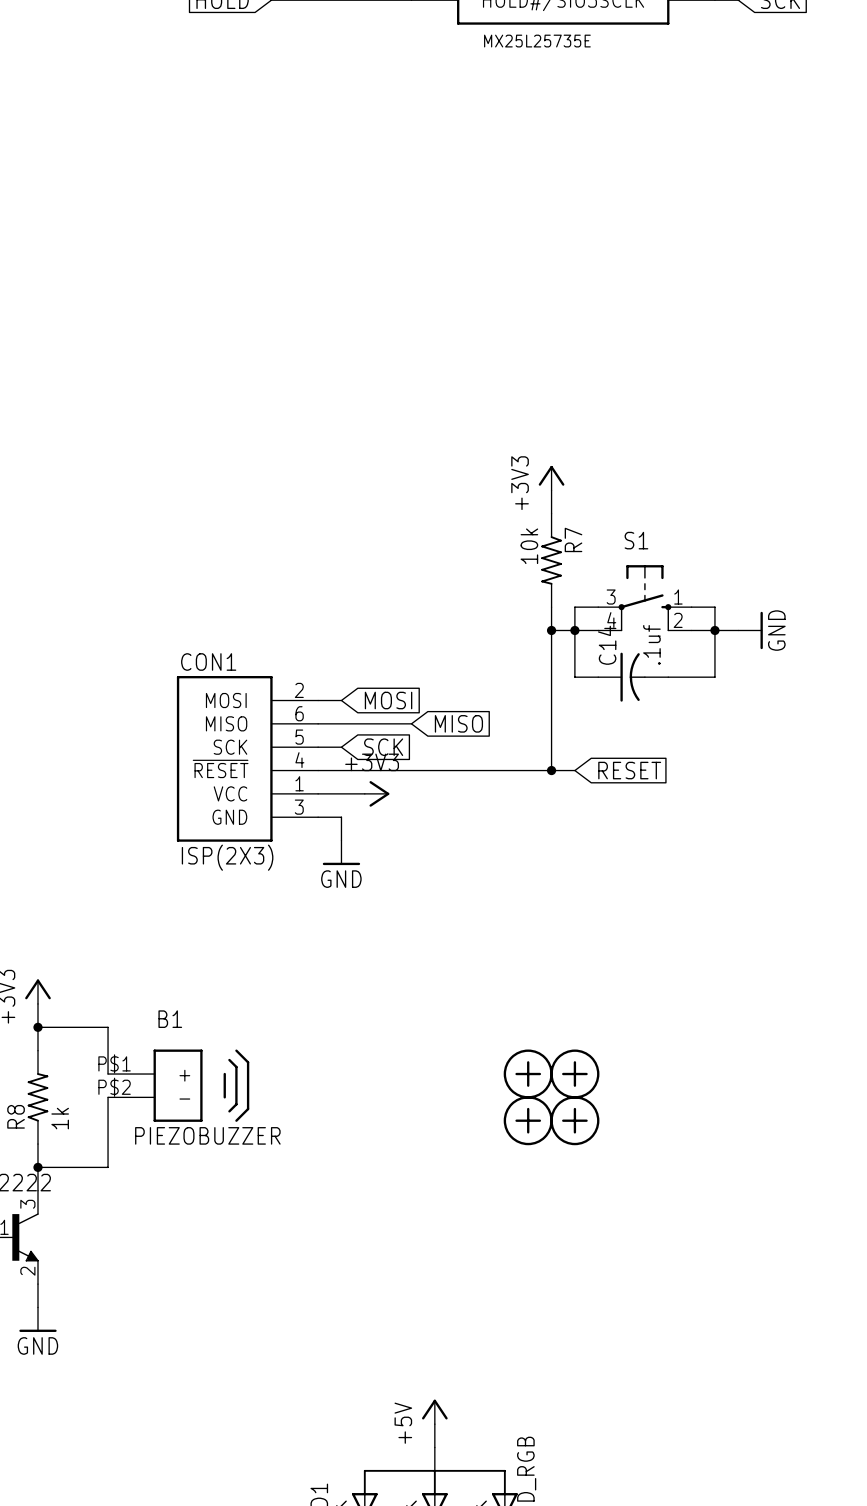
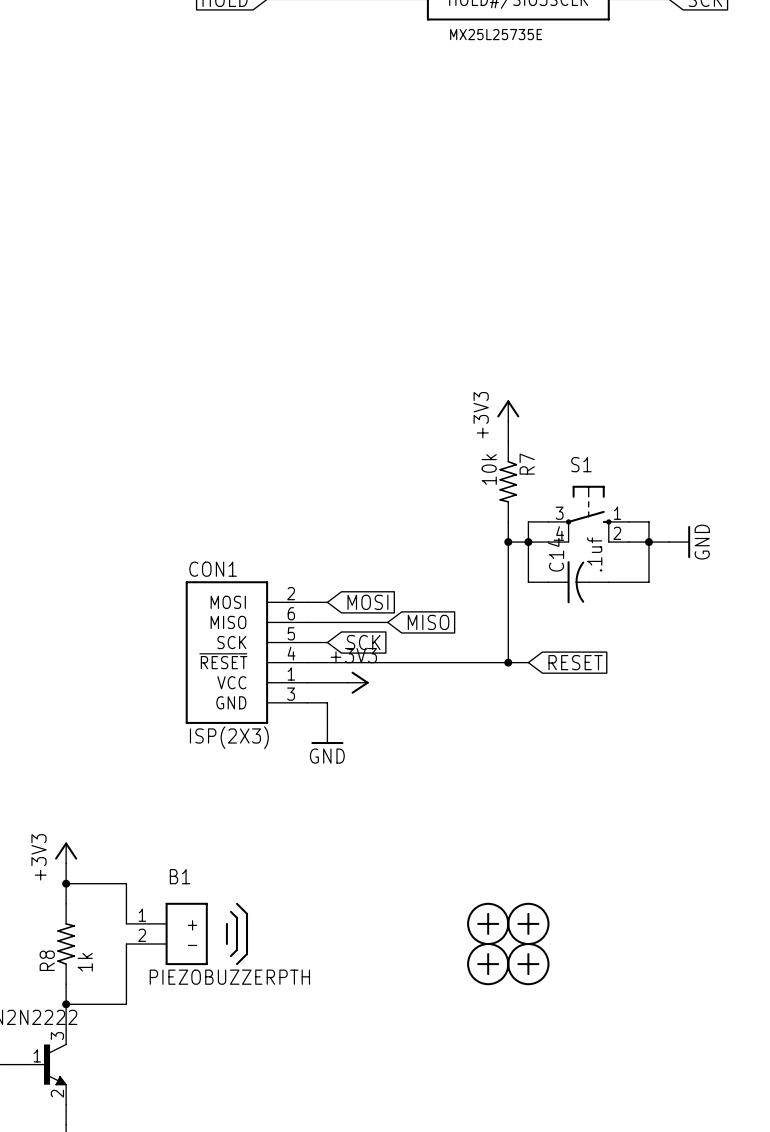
B1 pin number: P$1 (114, 1063) -> 1 (142, 915)
B1 pin number: P$2 (114, 1087) -> 2 (142, 935)
B1 value: PIEZOBUZZER (207, 1135) -> PIEZOBUZZERPTH (229, 977)

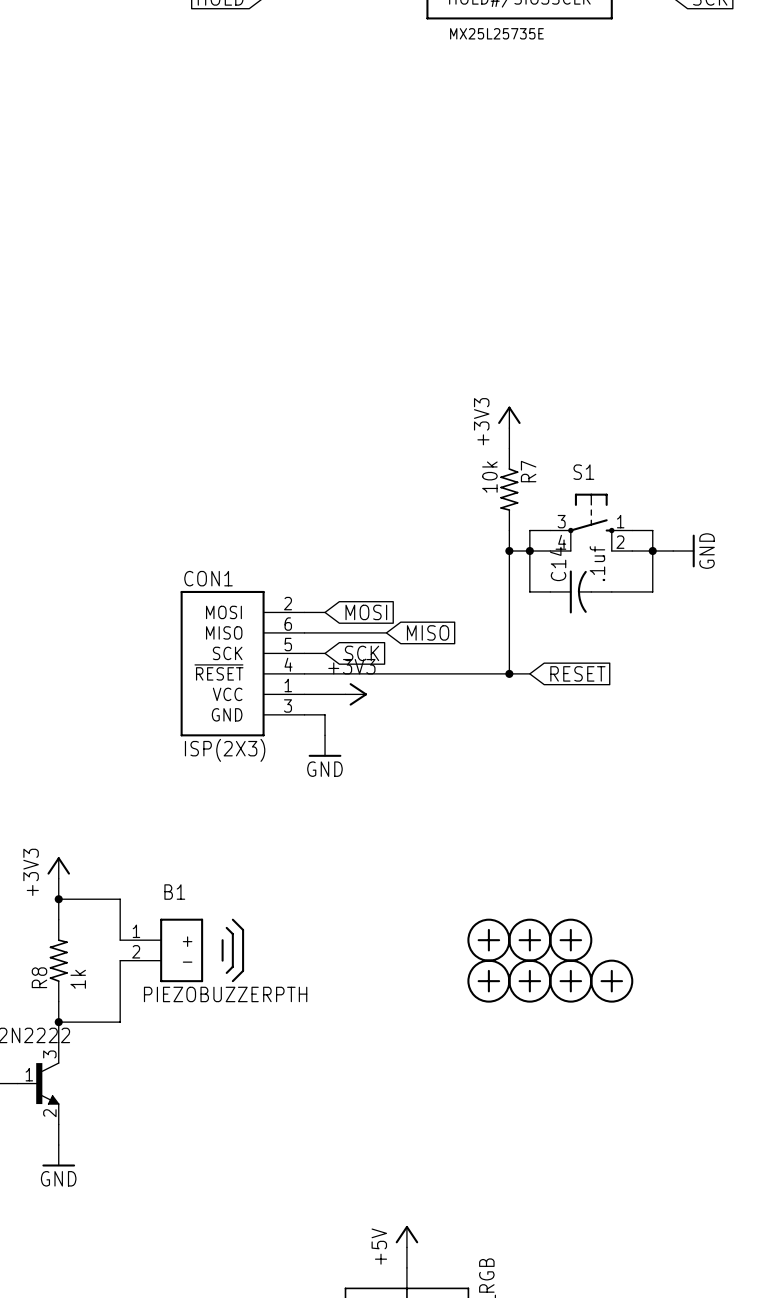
part: none -> (570, 940)
part: none -> (570, 981)
part: none -> (611, 981)

